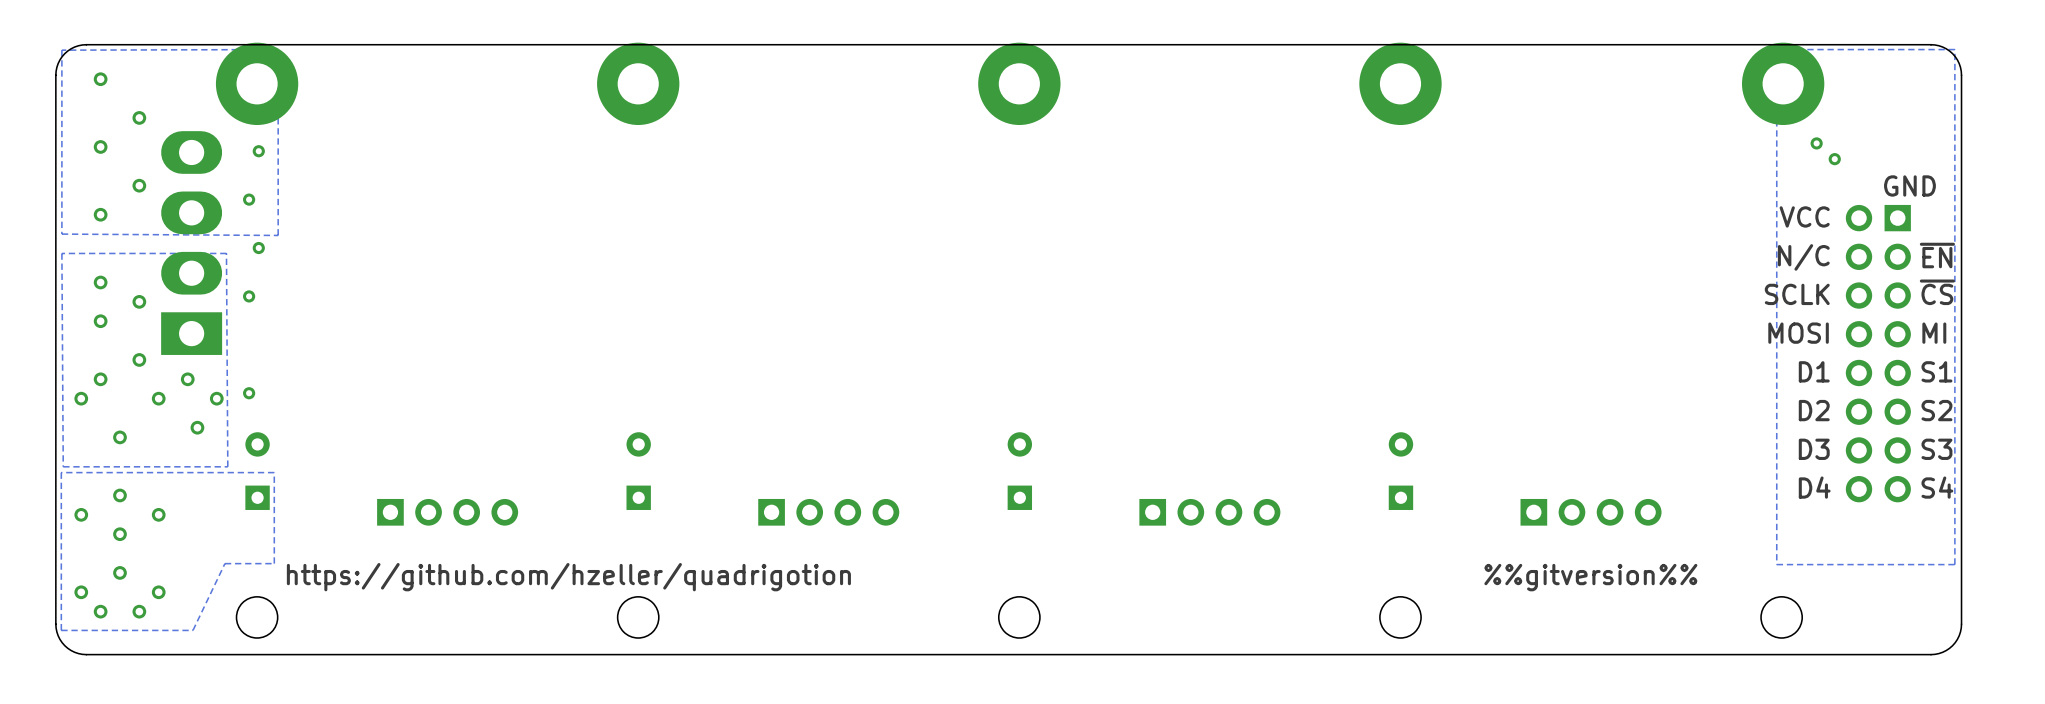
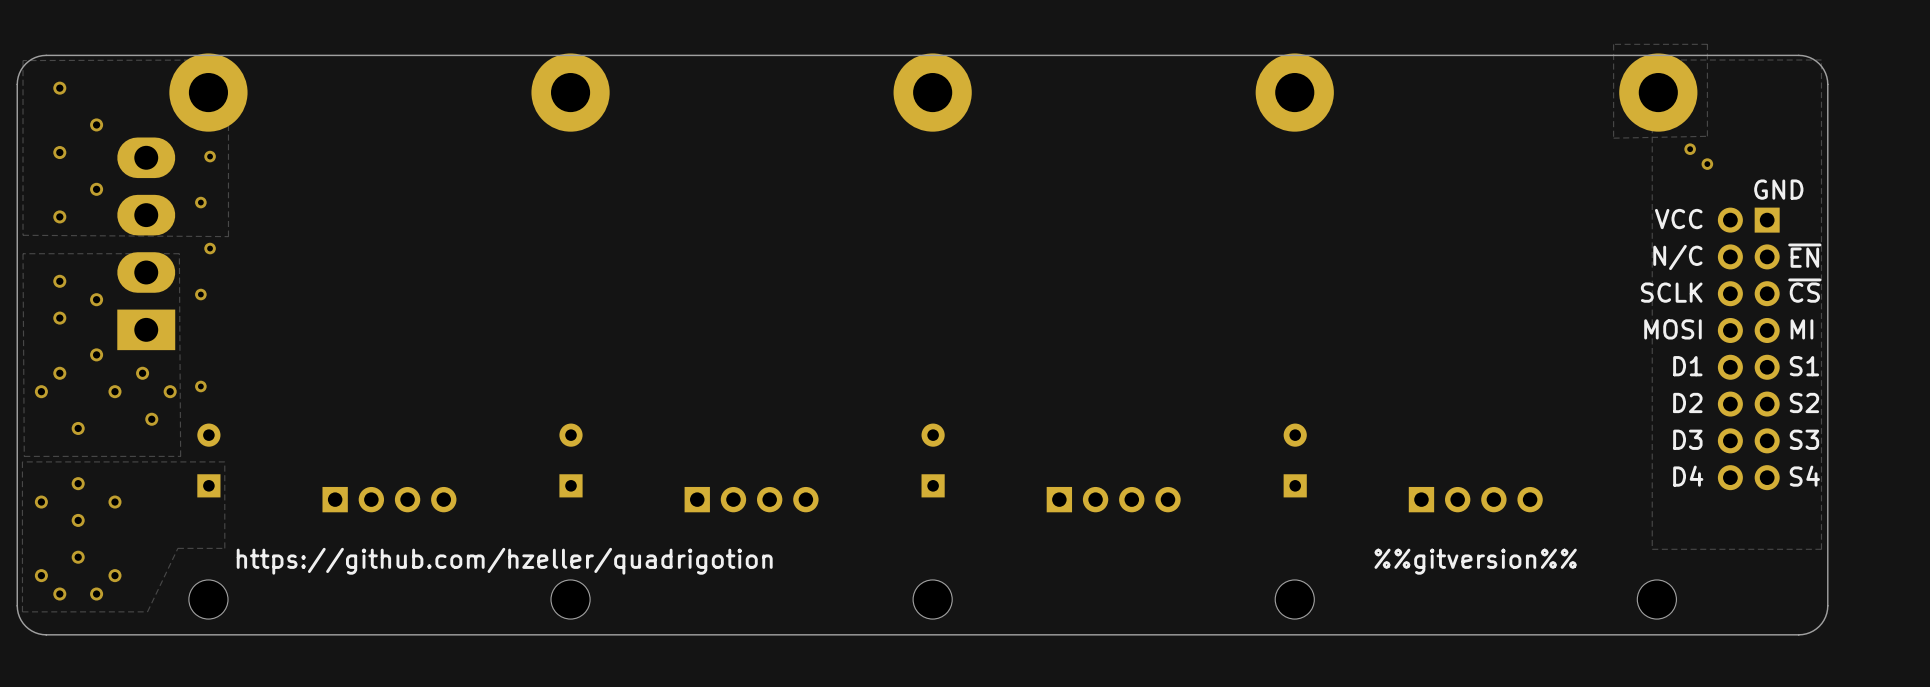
zone outline: none -> (1707, 44) (1613, 44) (1613, 138) (1707, 136) (1707, 44)

